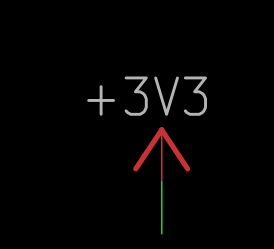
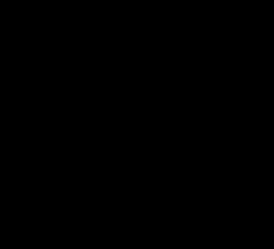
power symbol: +3V3 (161, 154) -> none
wire: (161, 181) (161, 233) -> none

